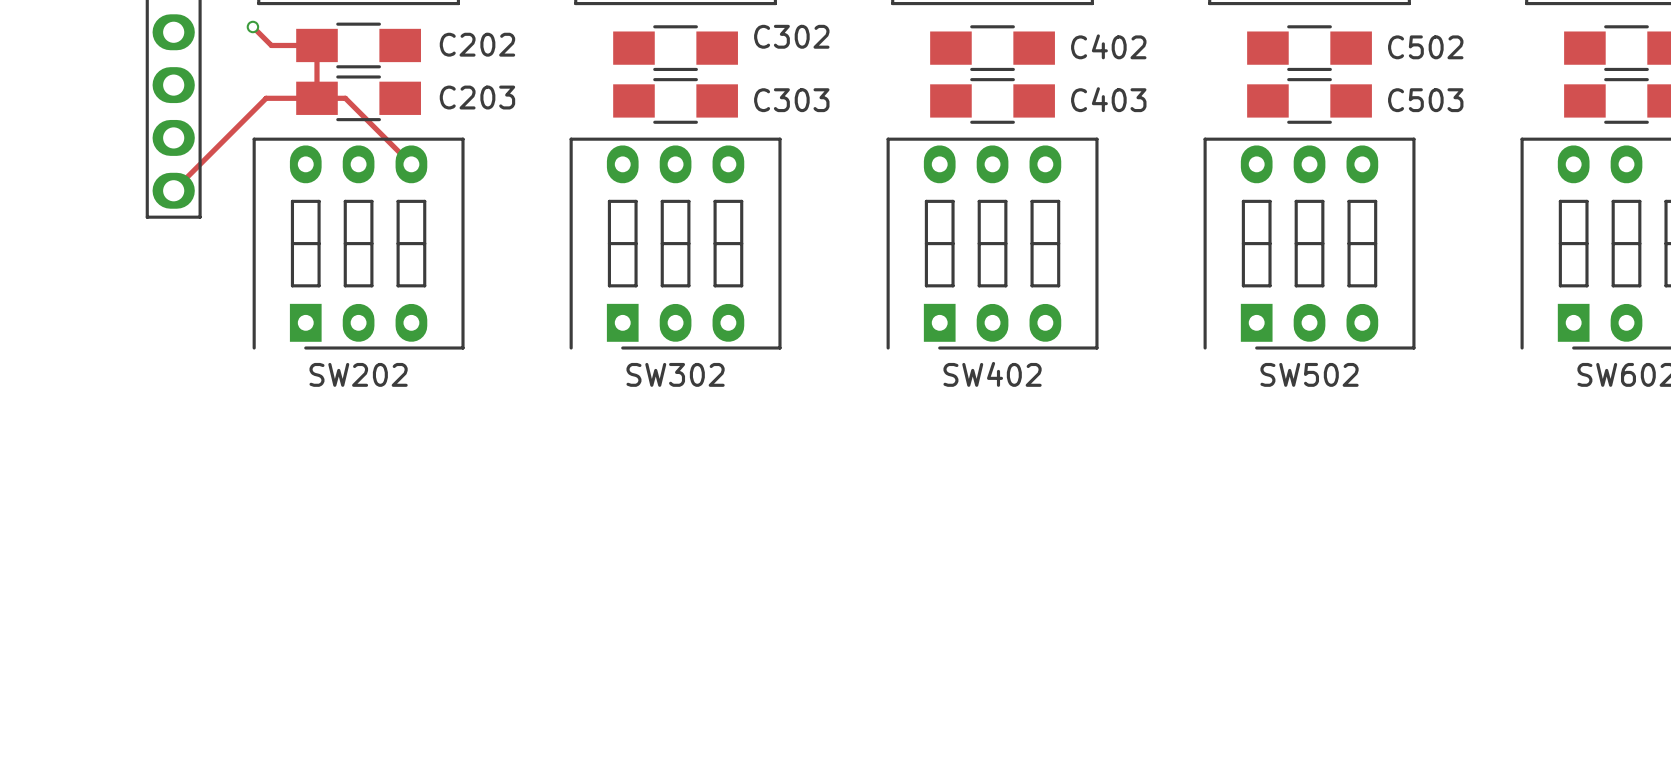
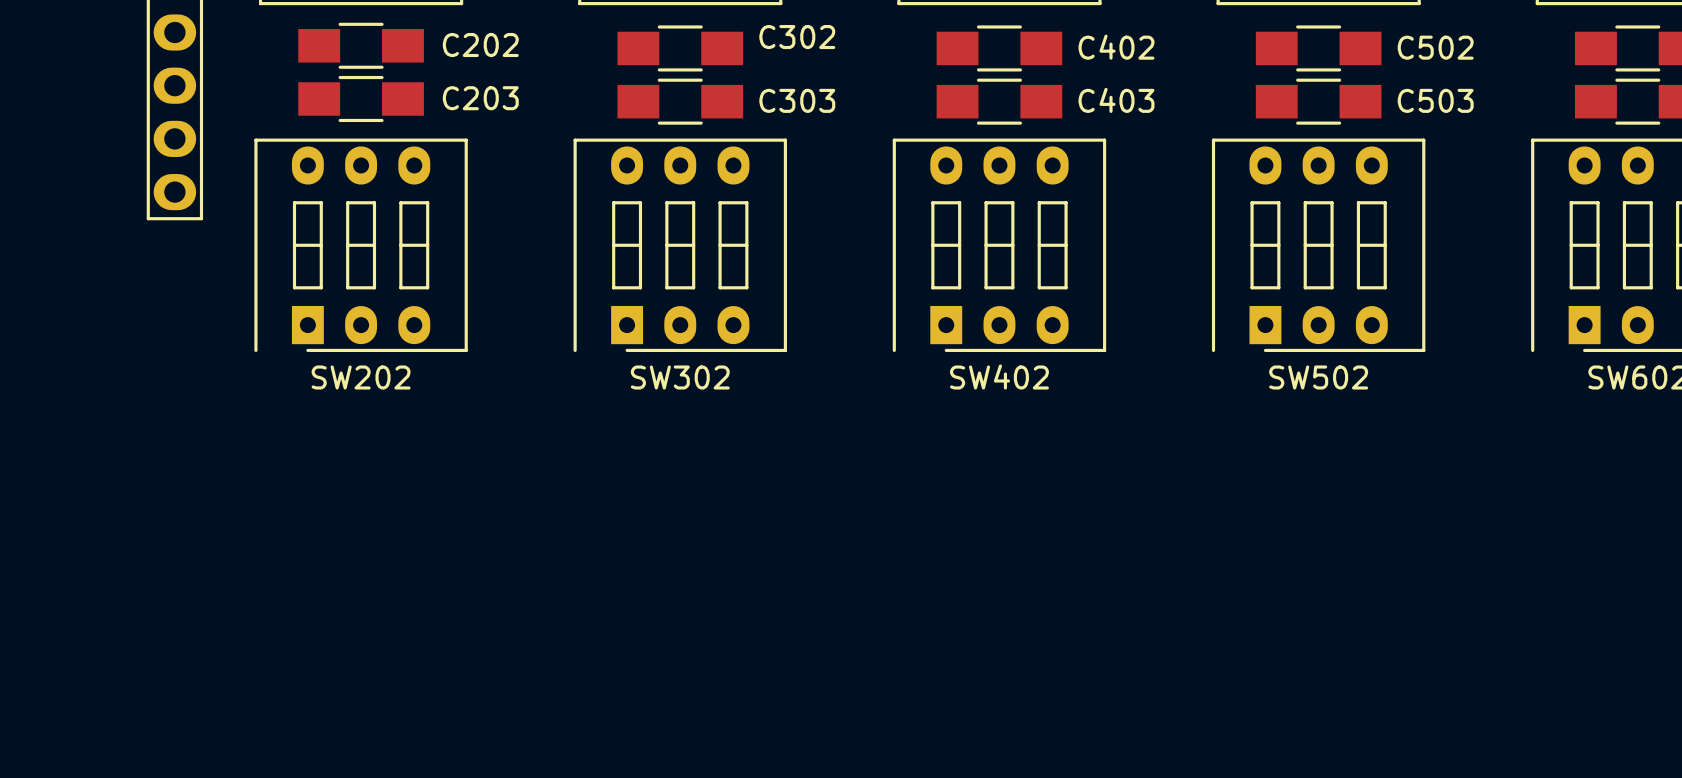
track: (252, 26) (271, 45) (316, 45) (316, 98) -> none
via: (252, 26) -> none
track: (411, 164) (345, 98) (266, 98) (173, 190) -> none

